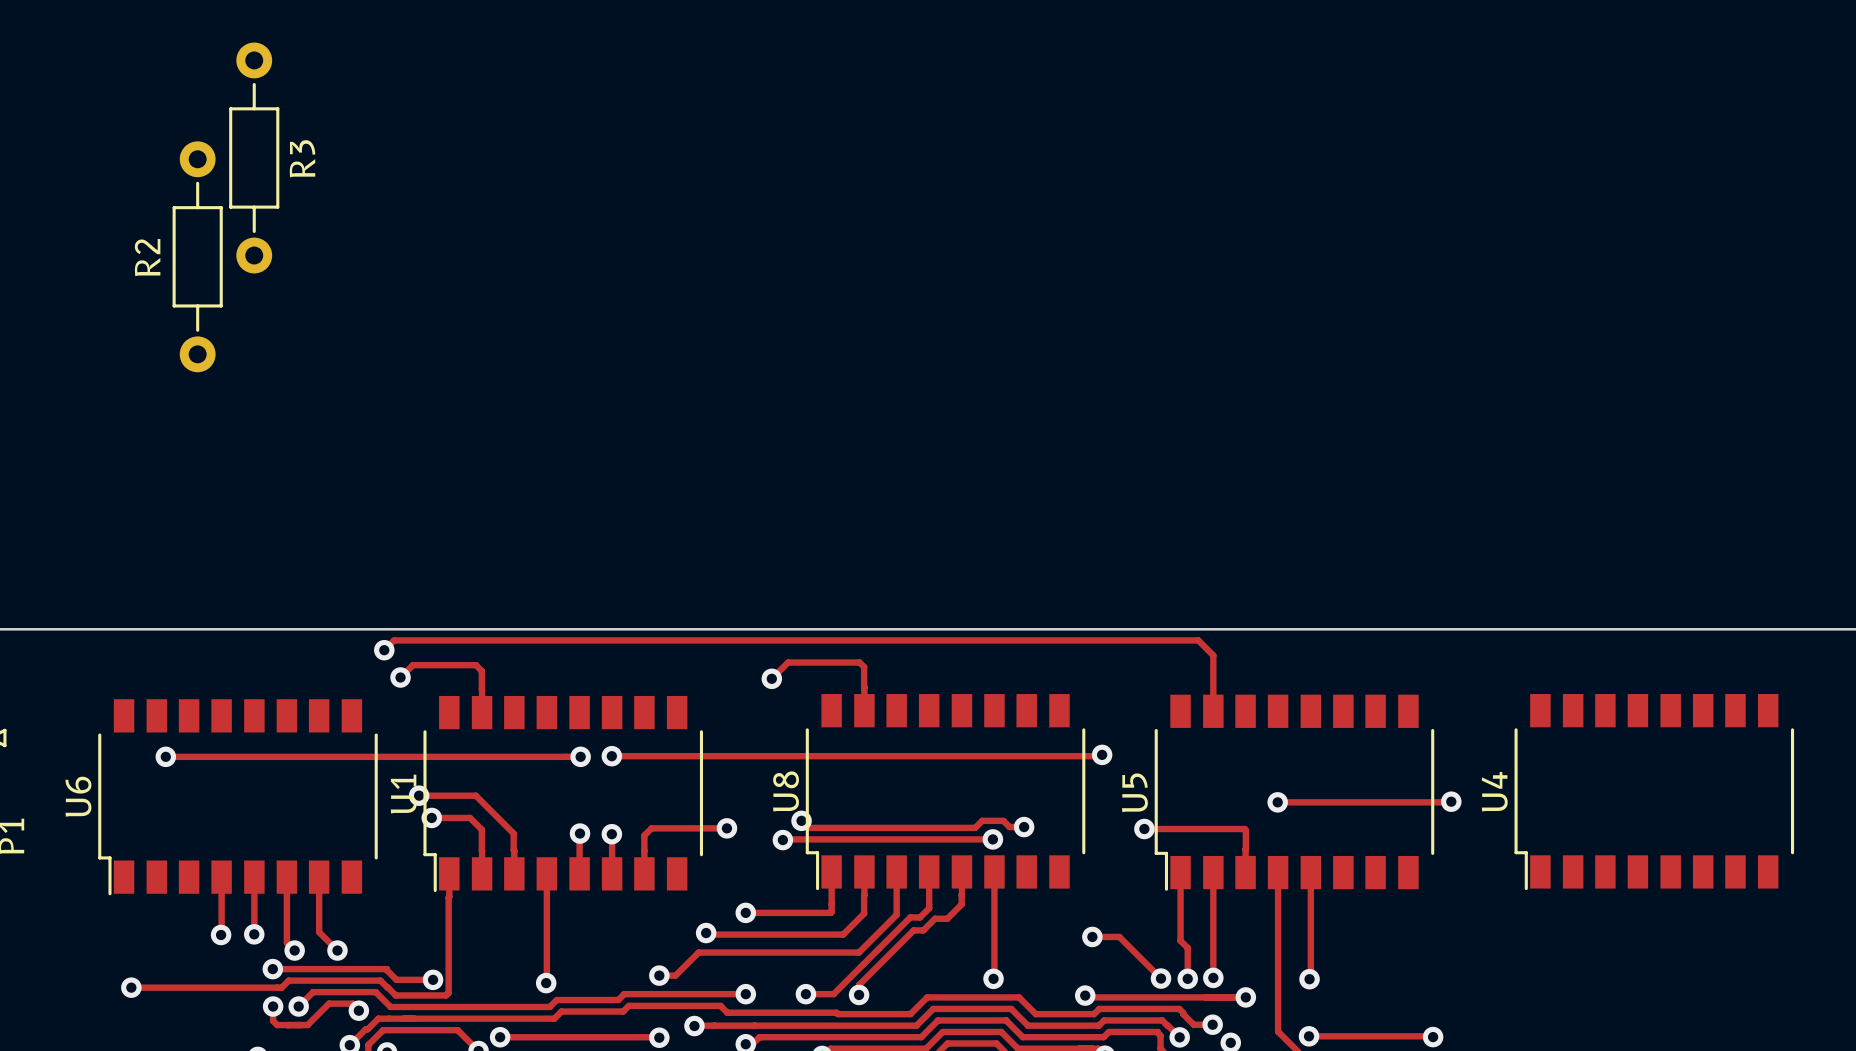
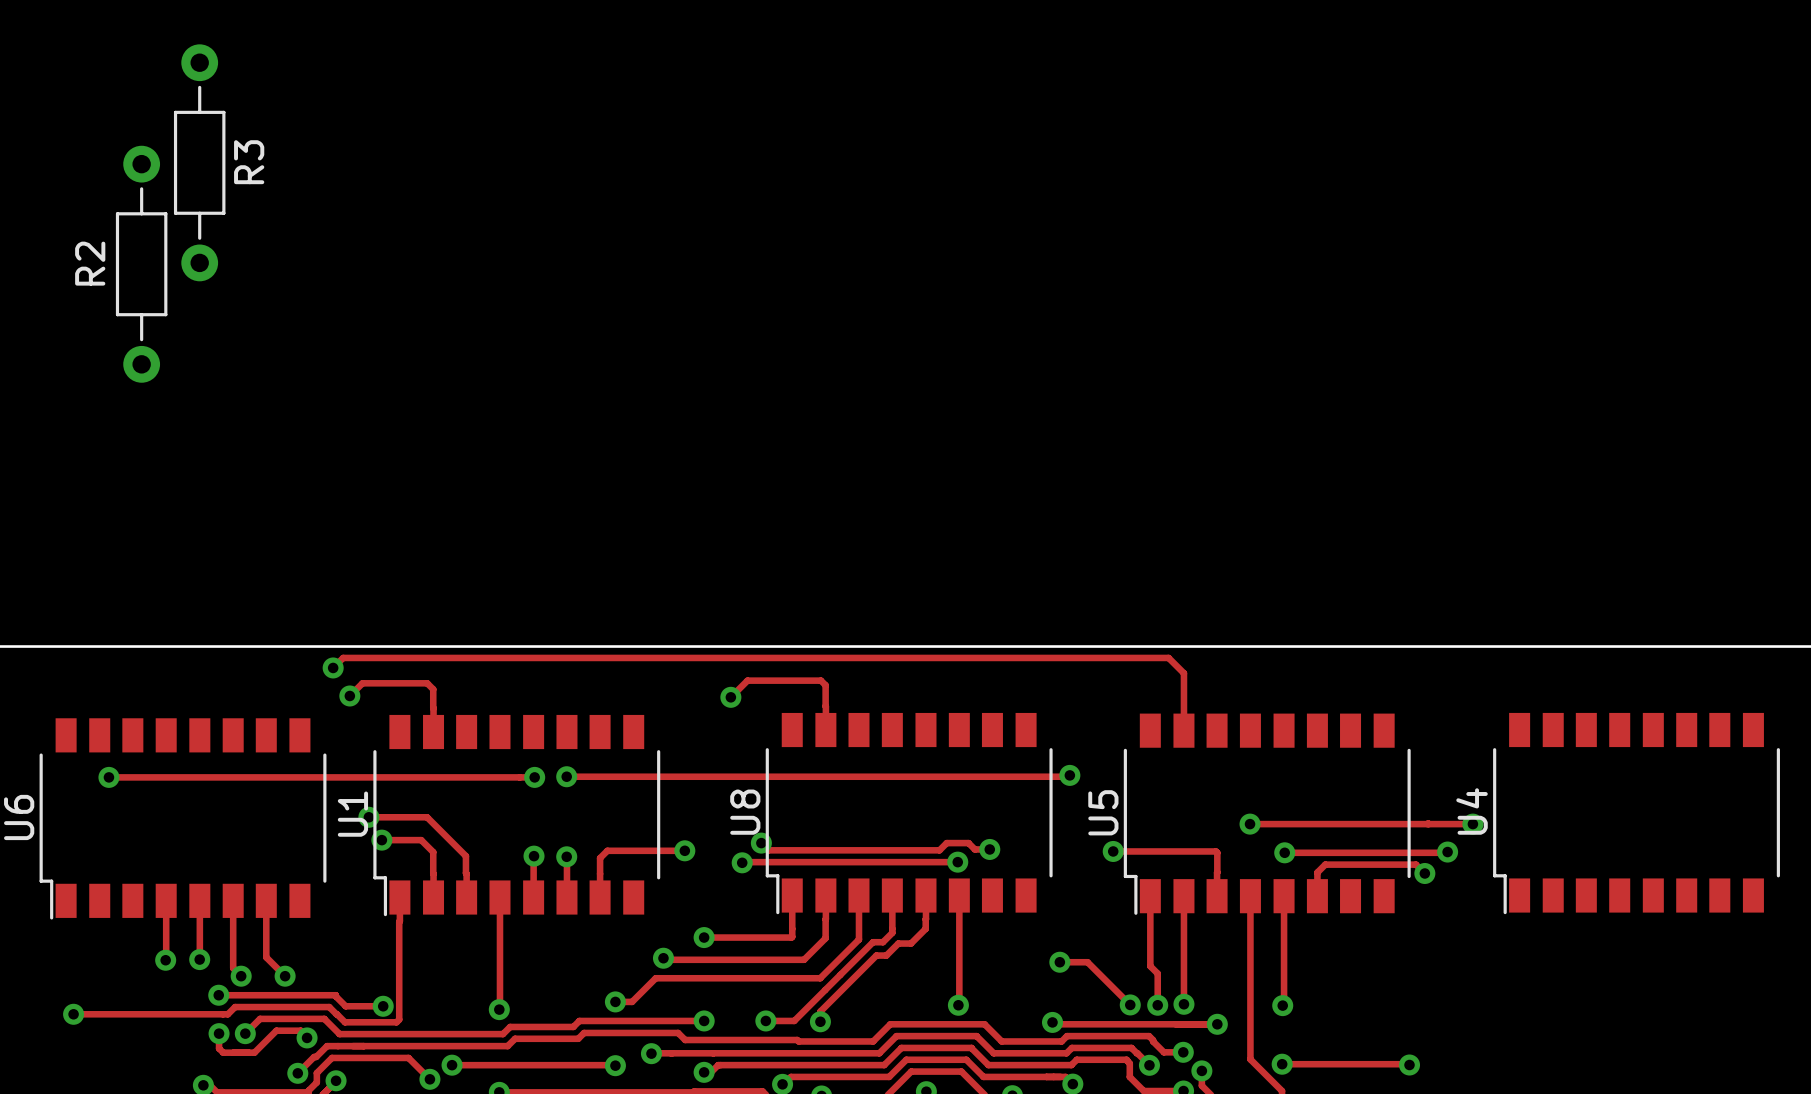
track: none -> (1428, 823) (1472, 824)
via: (1451, 801) -> none
via: none -> (1472, 824)
track: none -> (1447, 852) (1284, 852)
via: none -> (1447, 852)
via: none -> (1284, 852)
track: none -> (1424, 873) (1415, 864) (1325, 864) (1317, 872) (1317, 896)
via: none -> (1424, 873)

